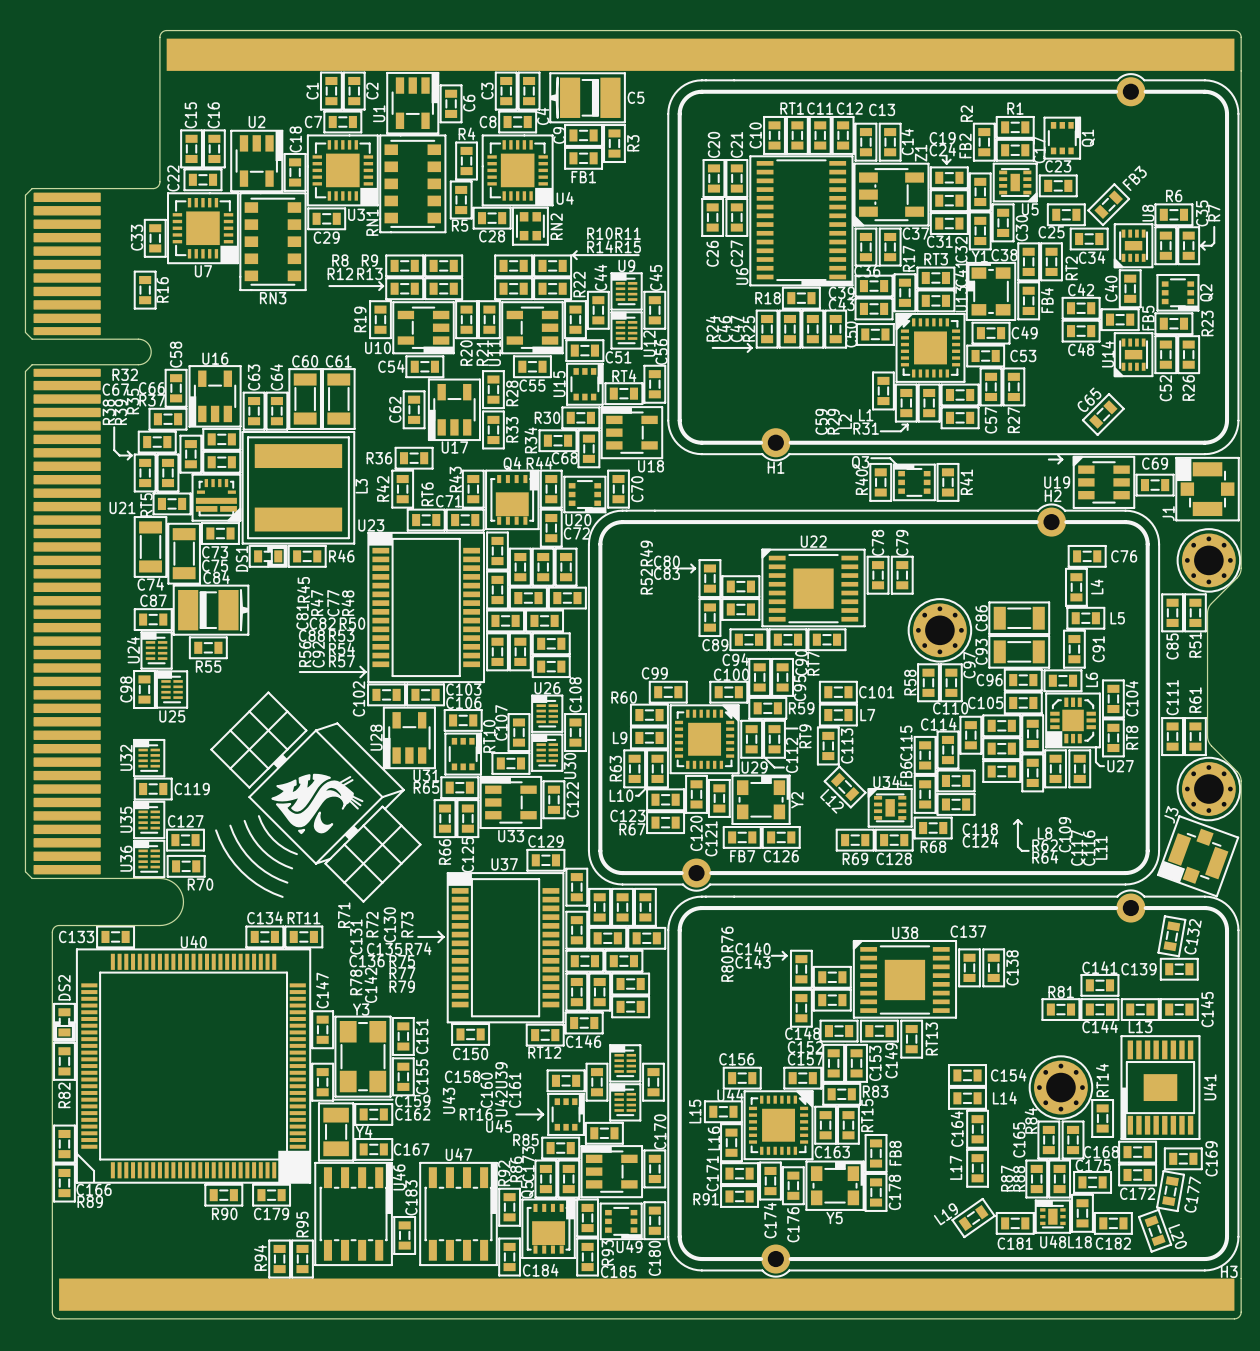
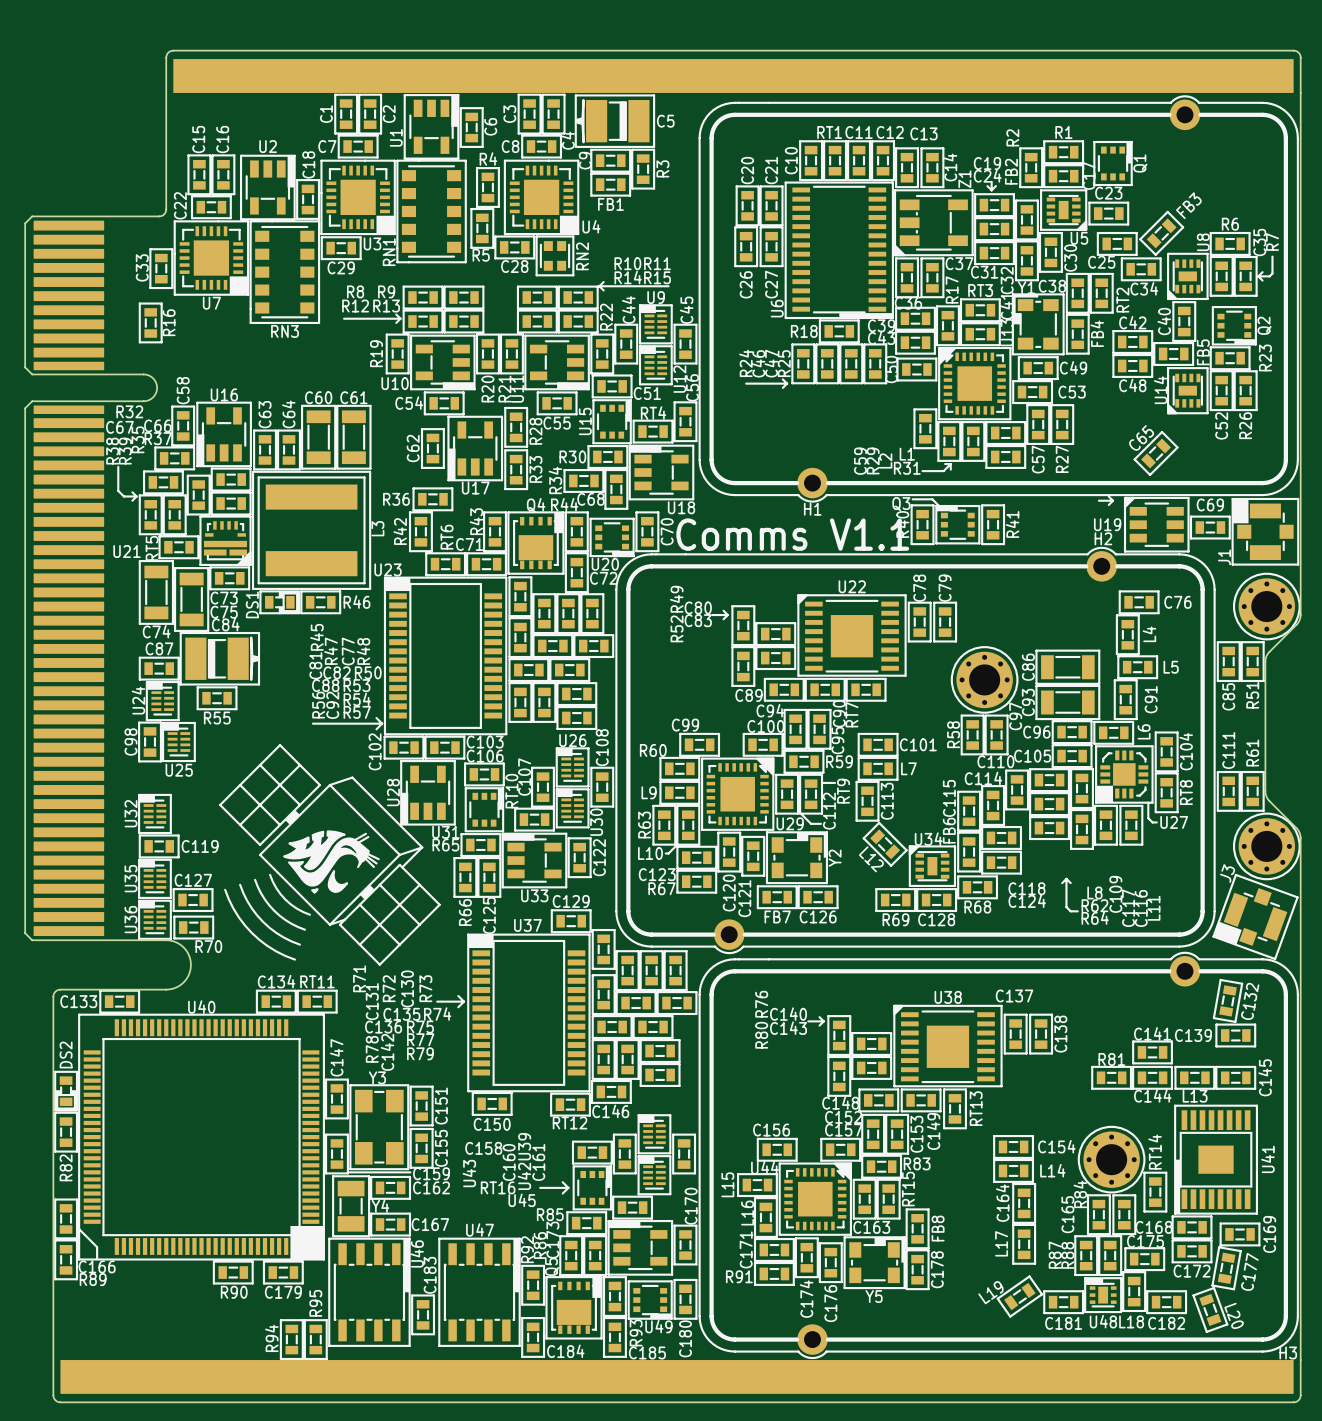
text: none -> Comms V1.1 (792, 534)

